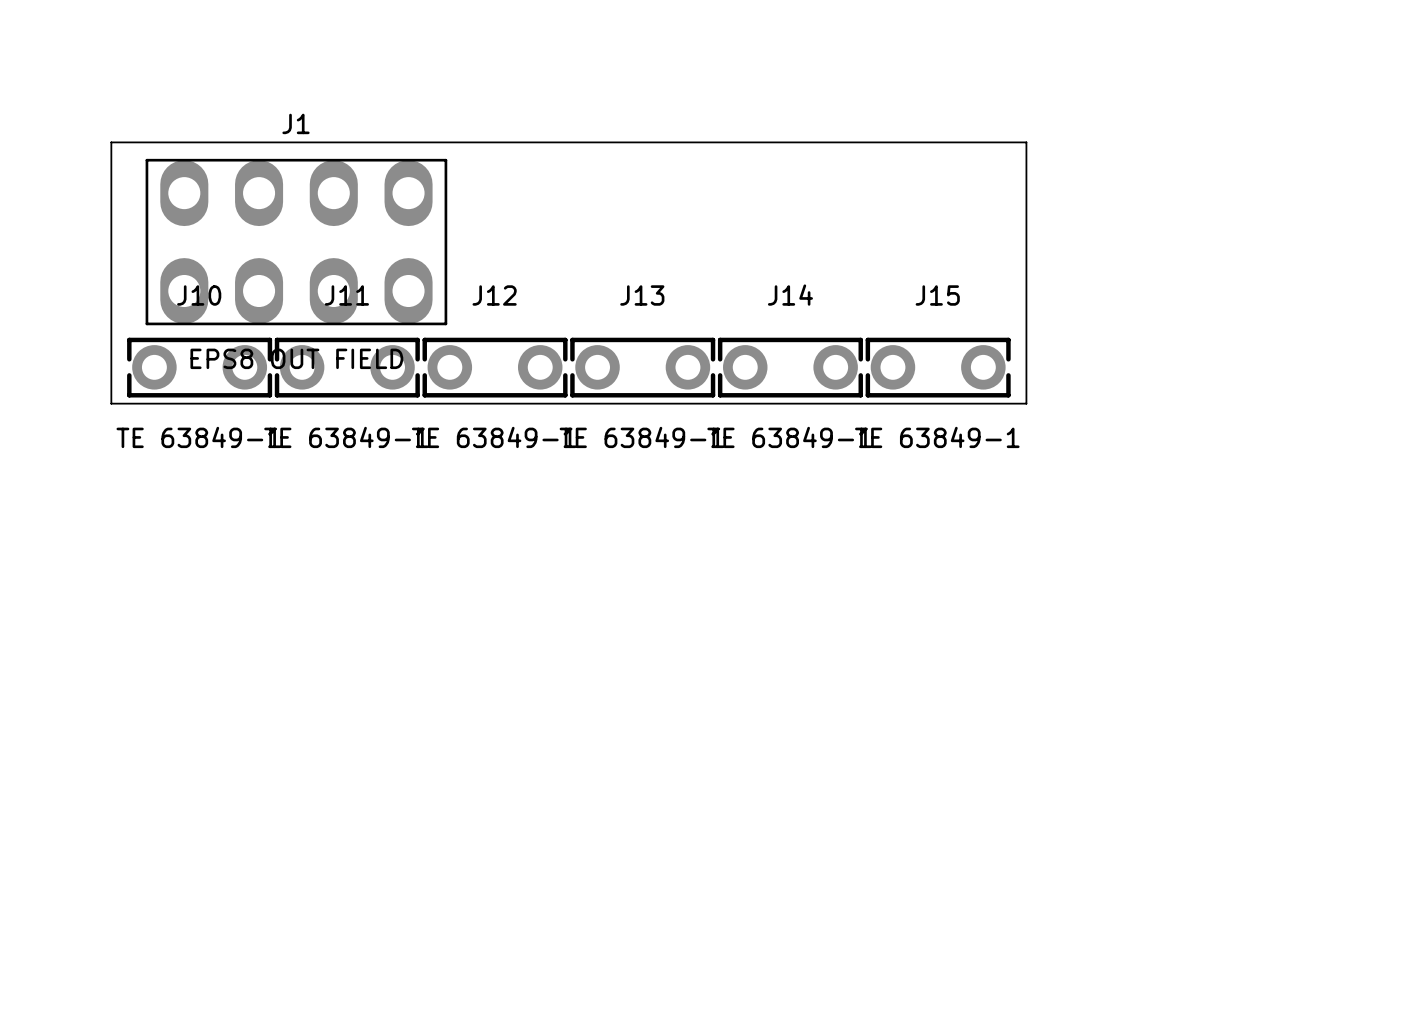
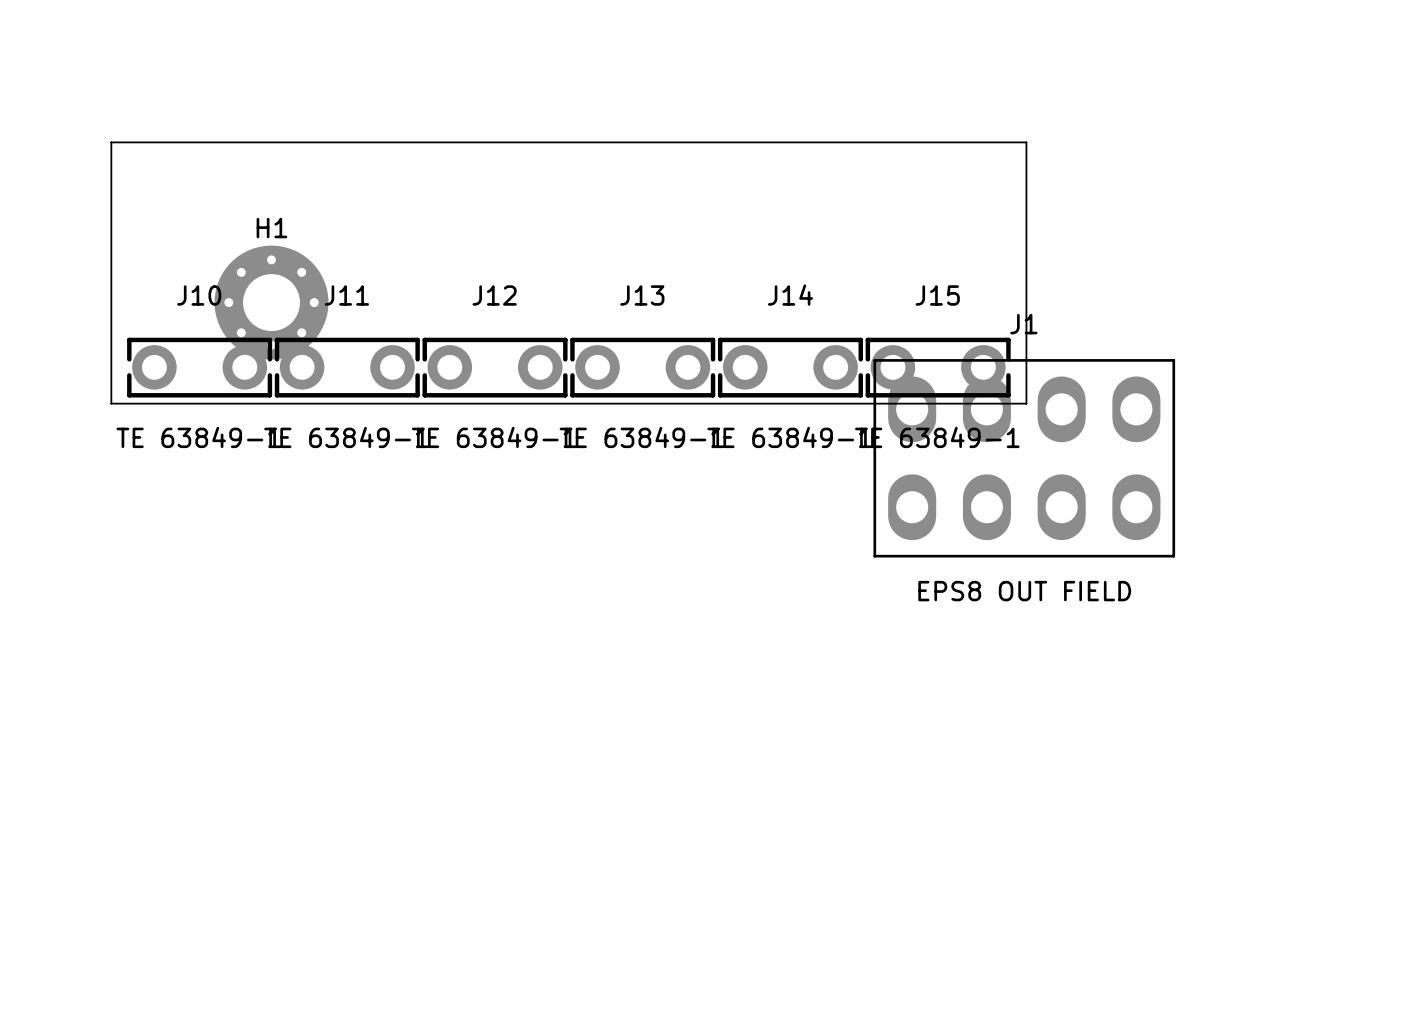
J1 footprint: [145, 158, 448, 326] -> [873, 359, 1176, 558]
H1: none -> (271, 302)

